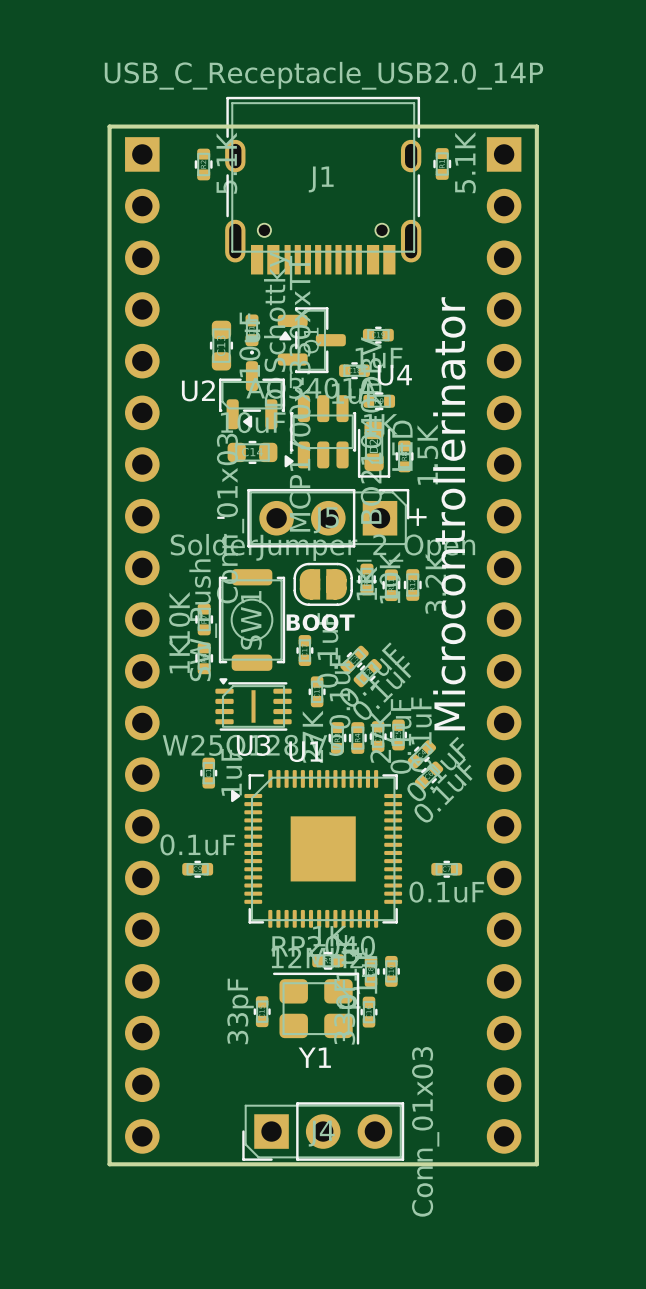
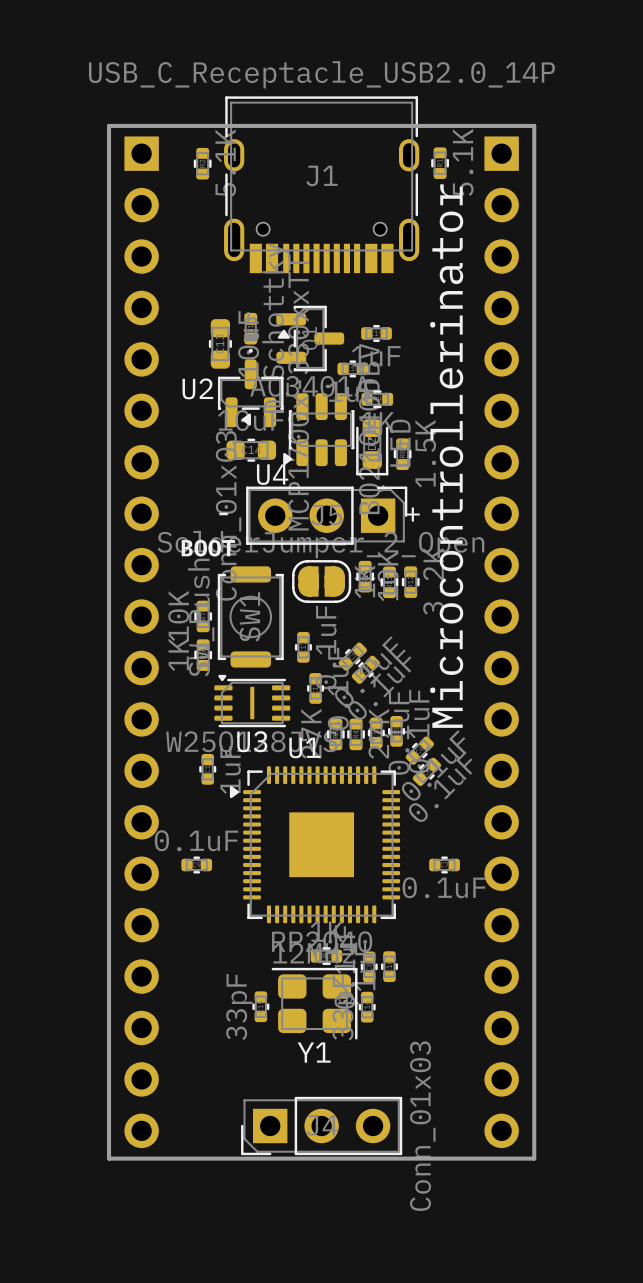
U4 name position: U4 (394, 375) -> U4 (272, 474)
text position: BOOT (320, 622) -> BOOT (208, 548)

